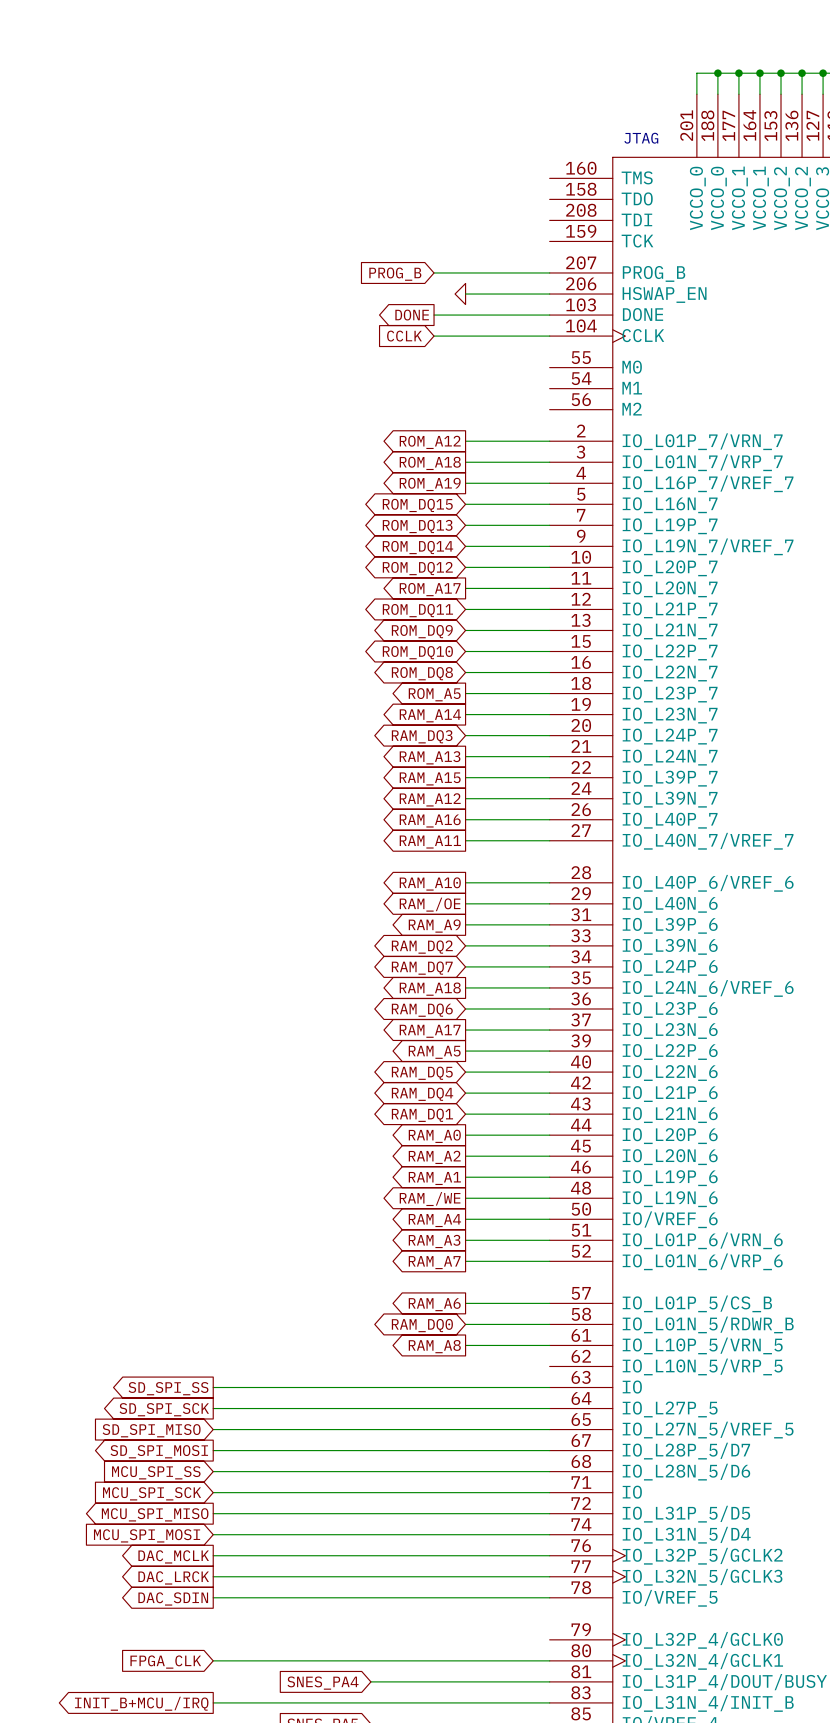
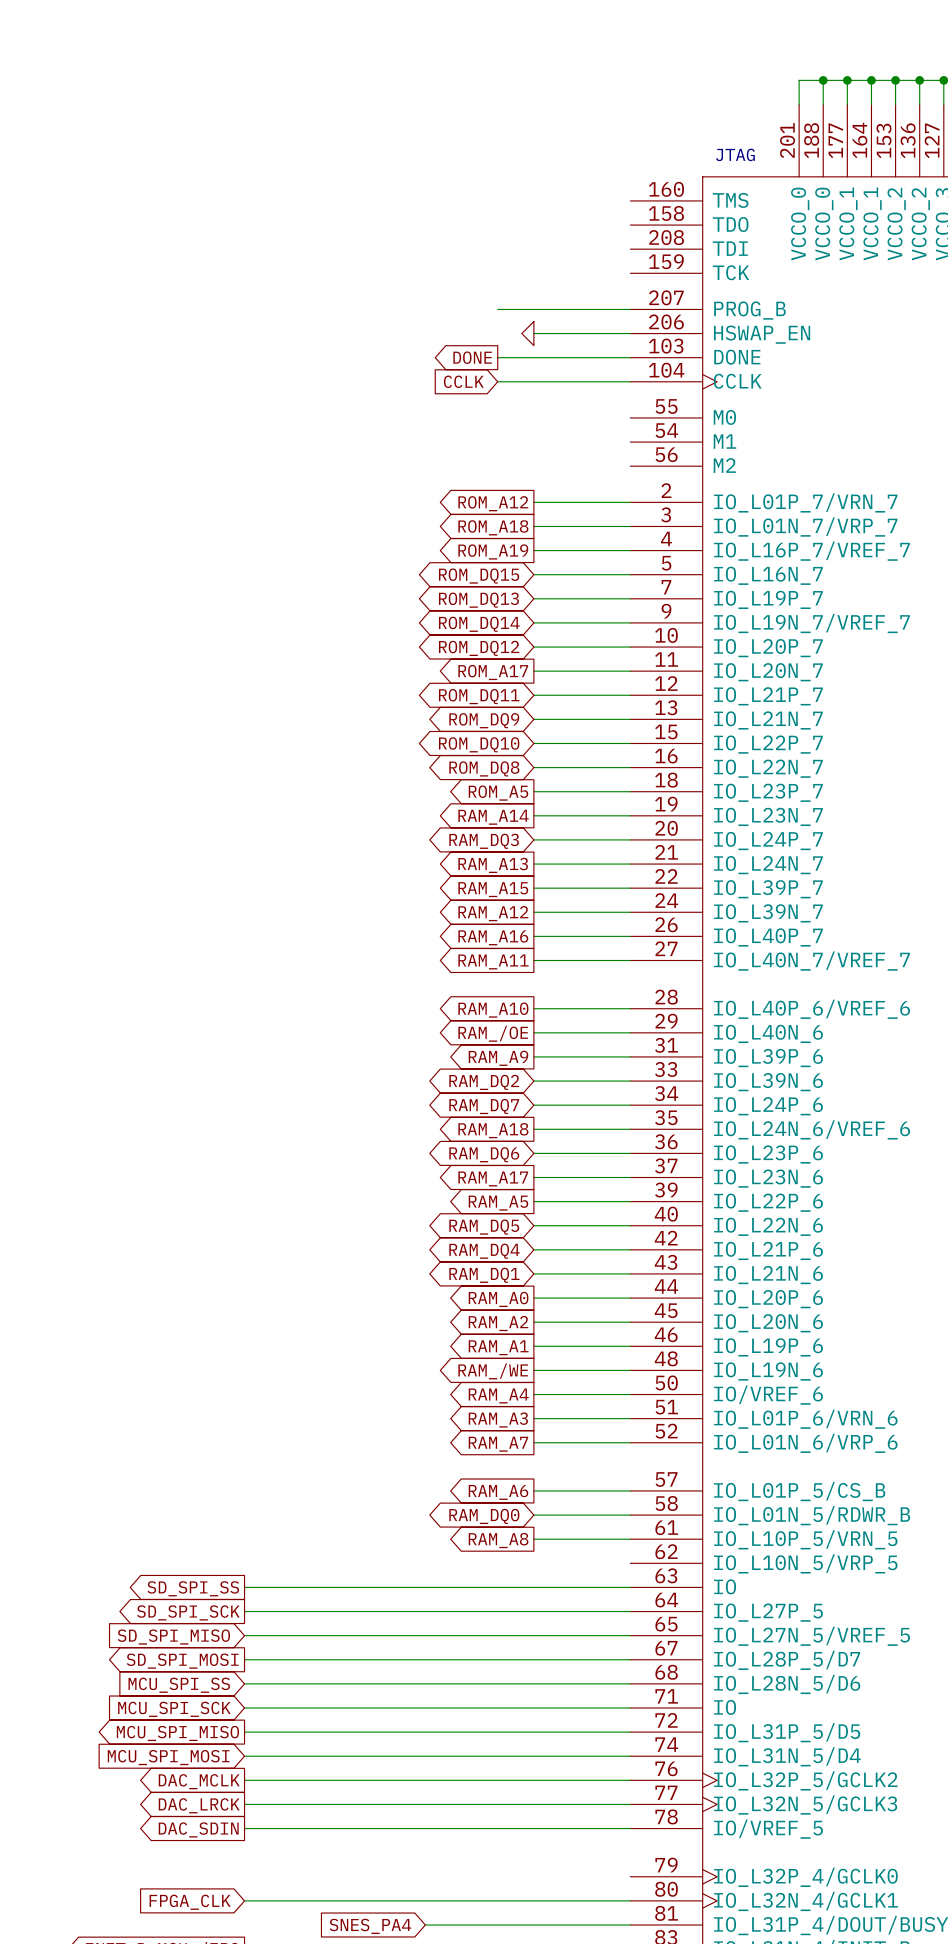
global label: PROG_B (395, 274) -> none

